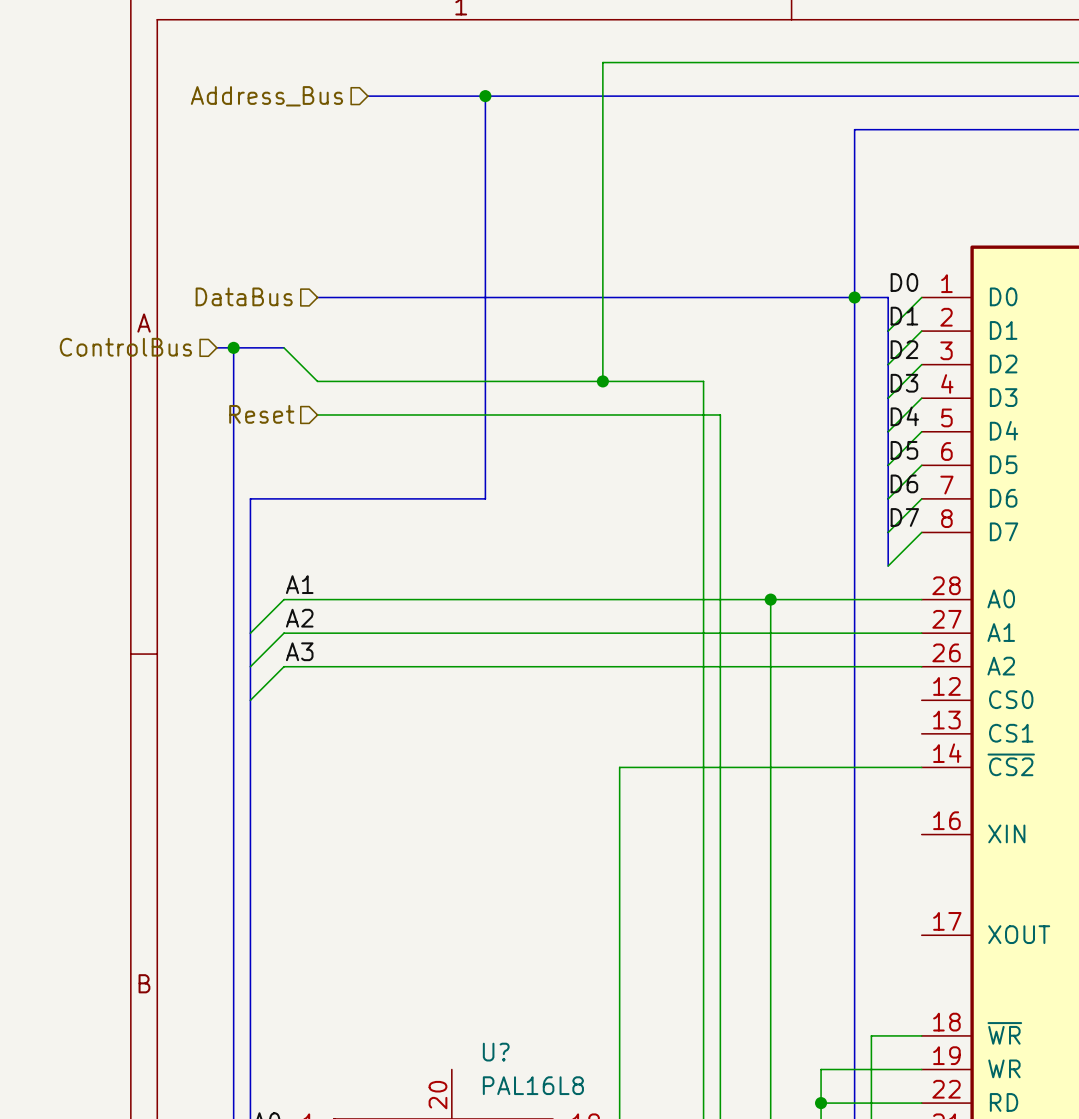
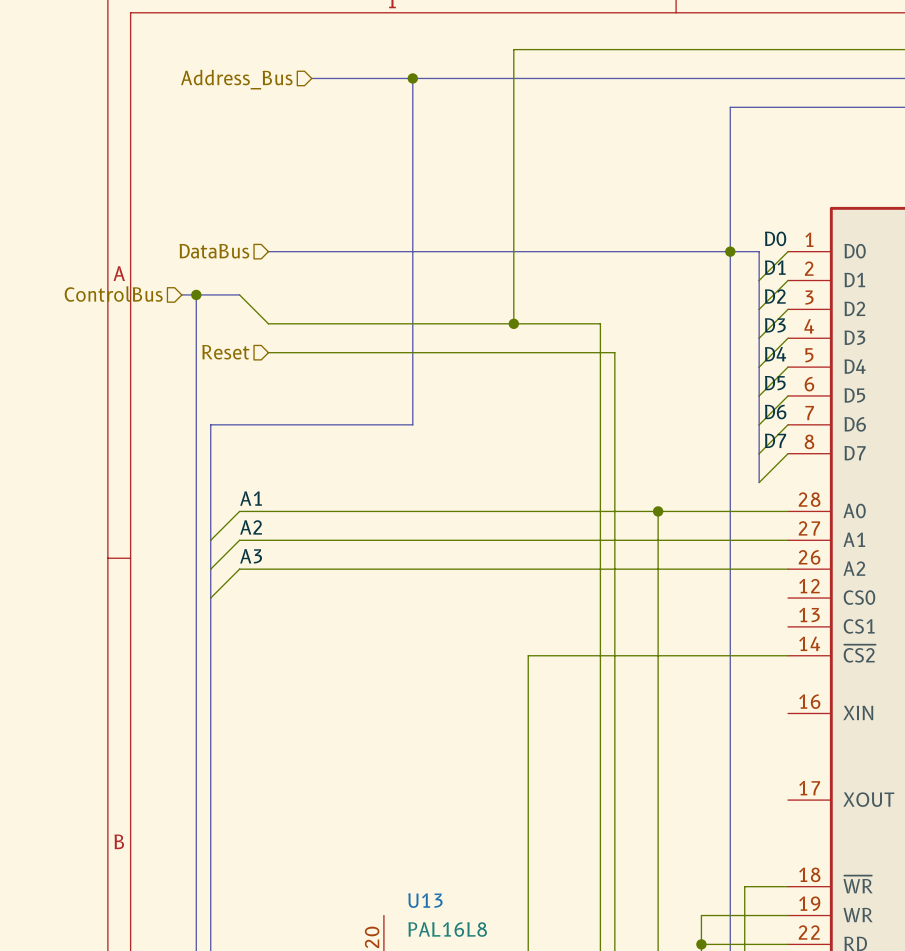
U? name: U? (496, 1052) -> U13 (425, 900)

